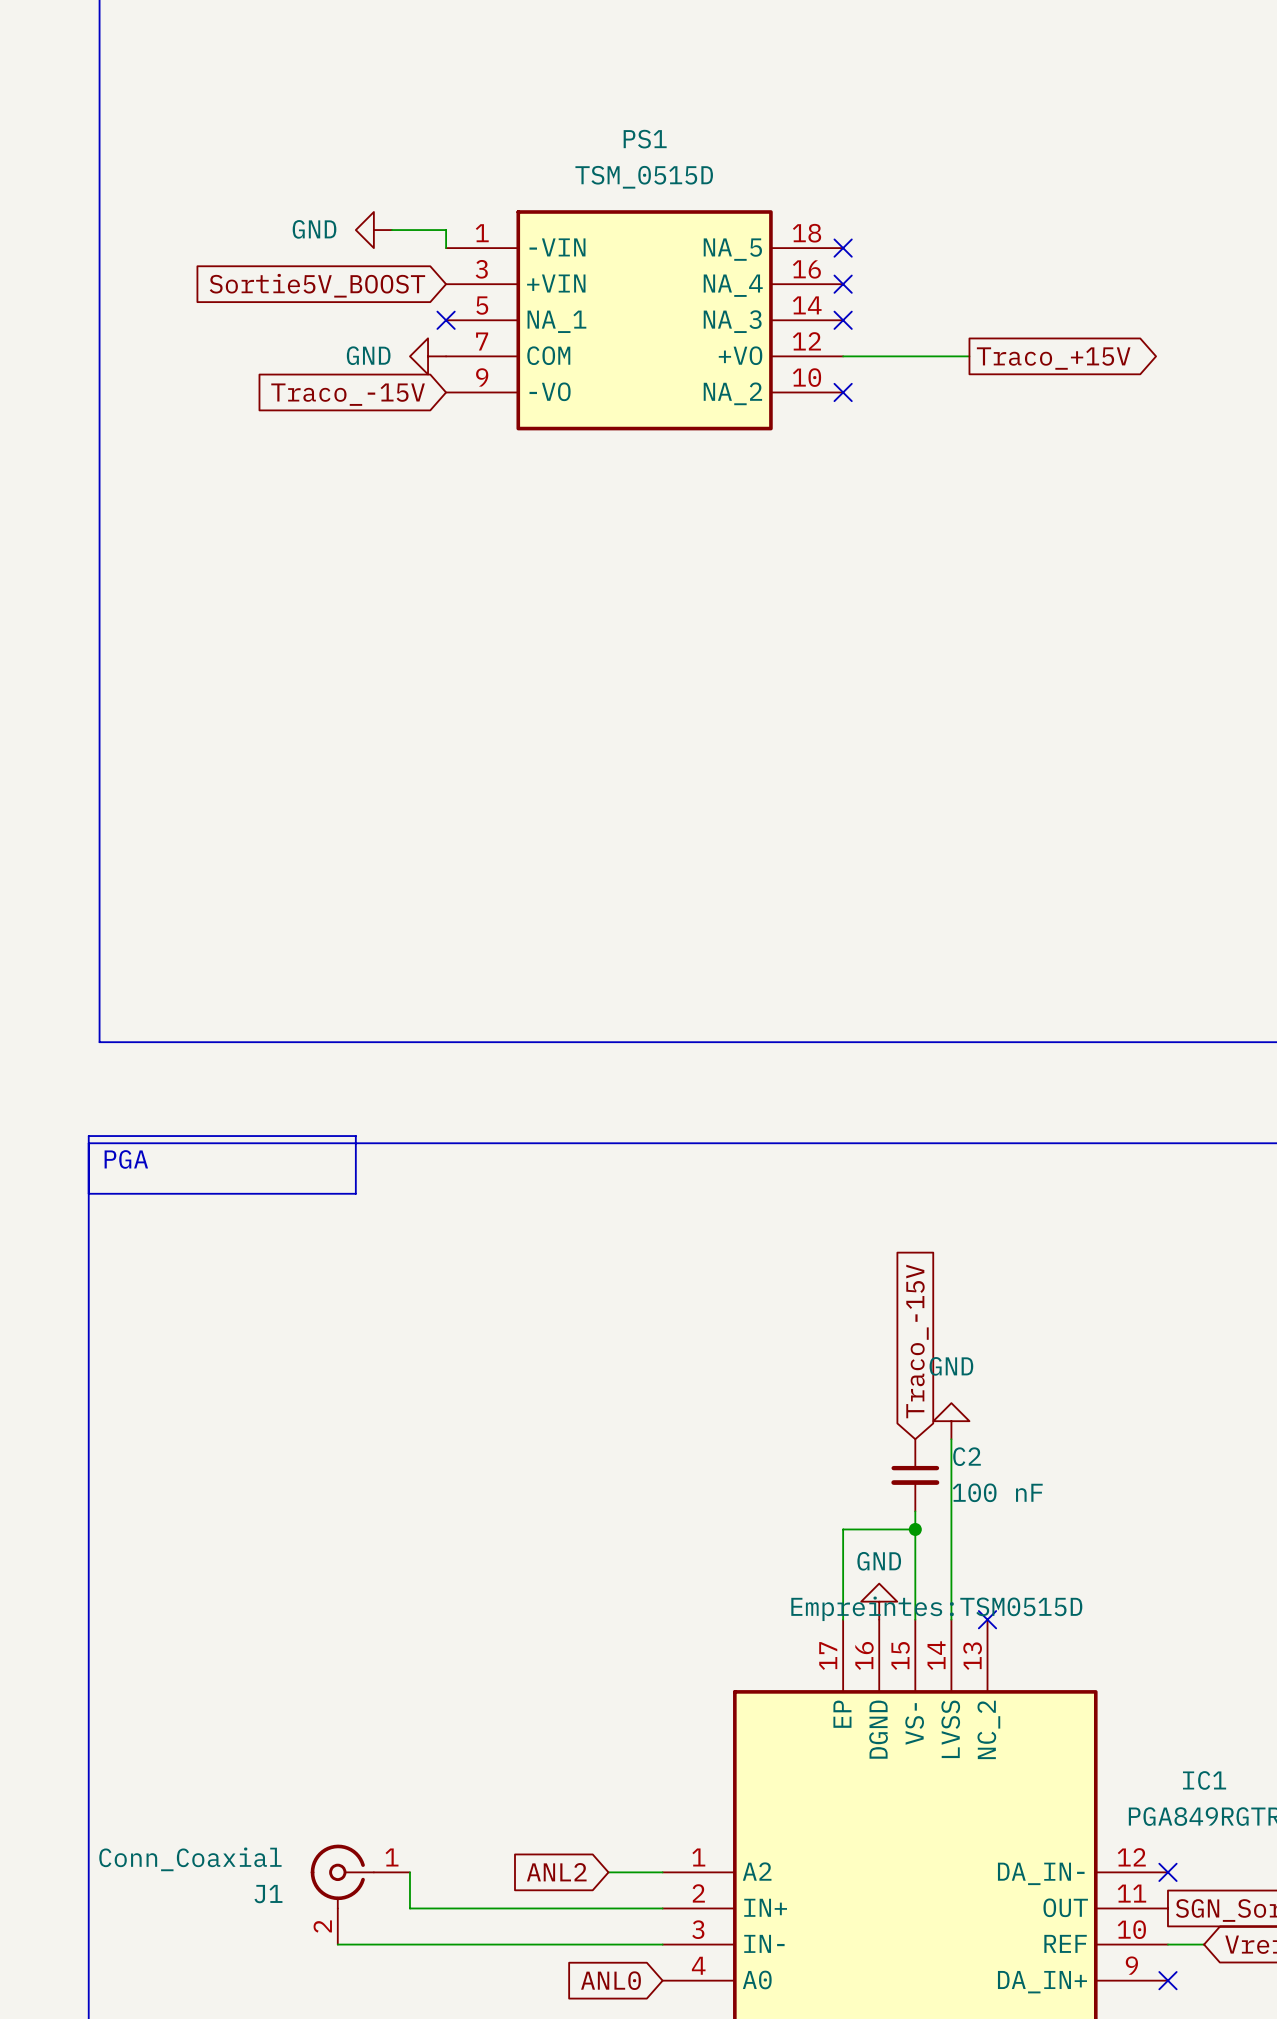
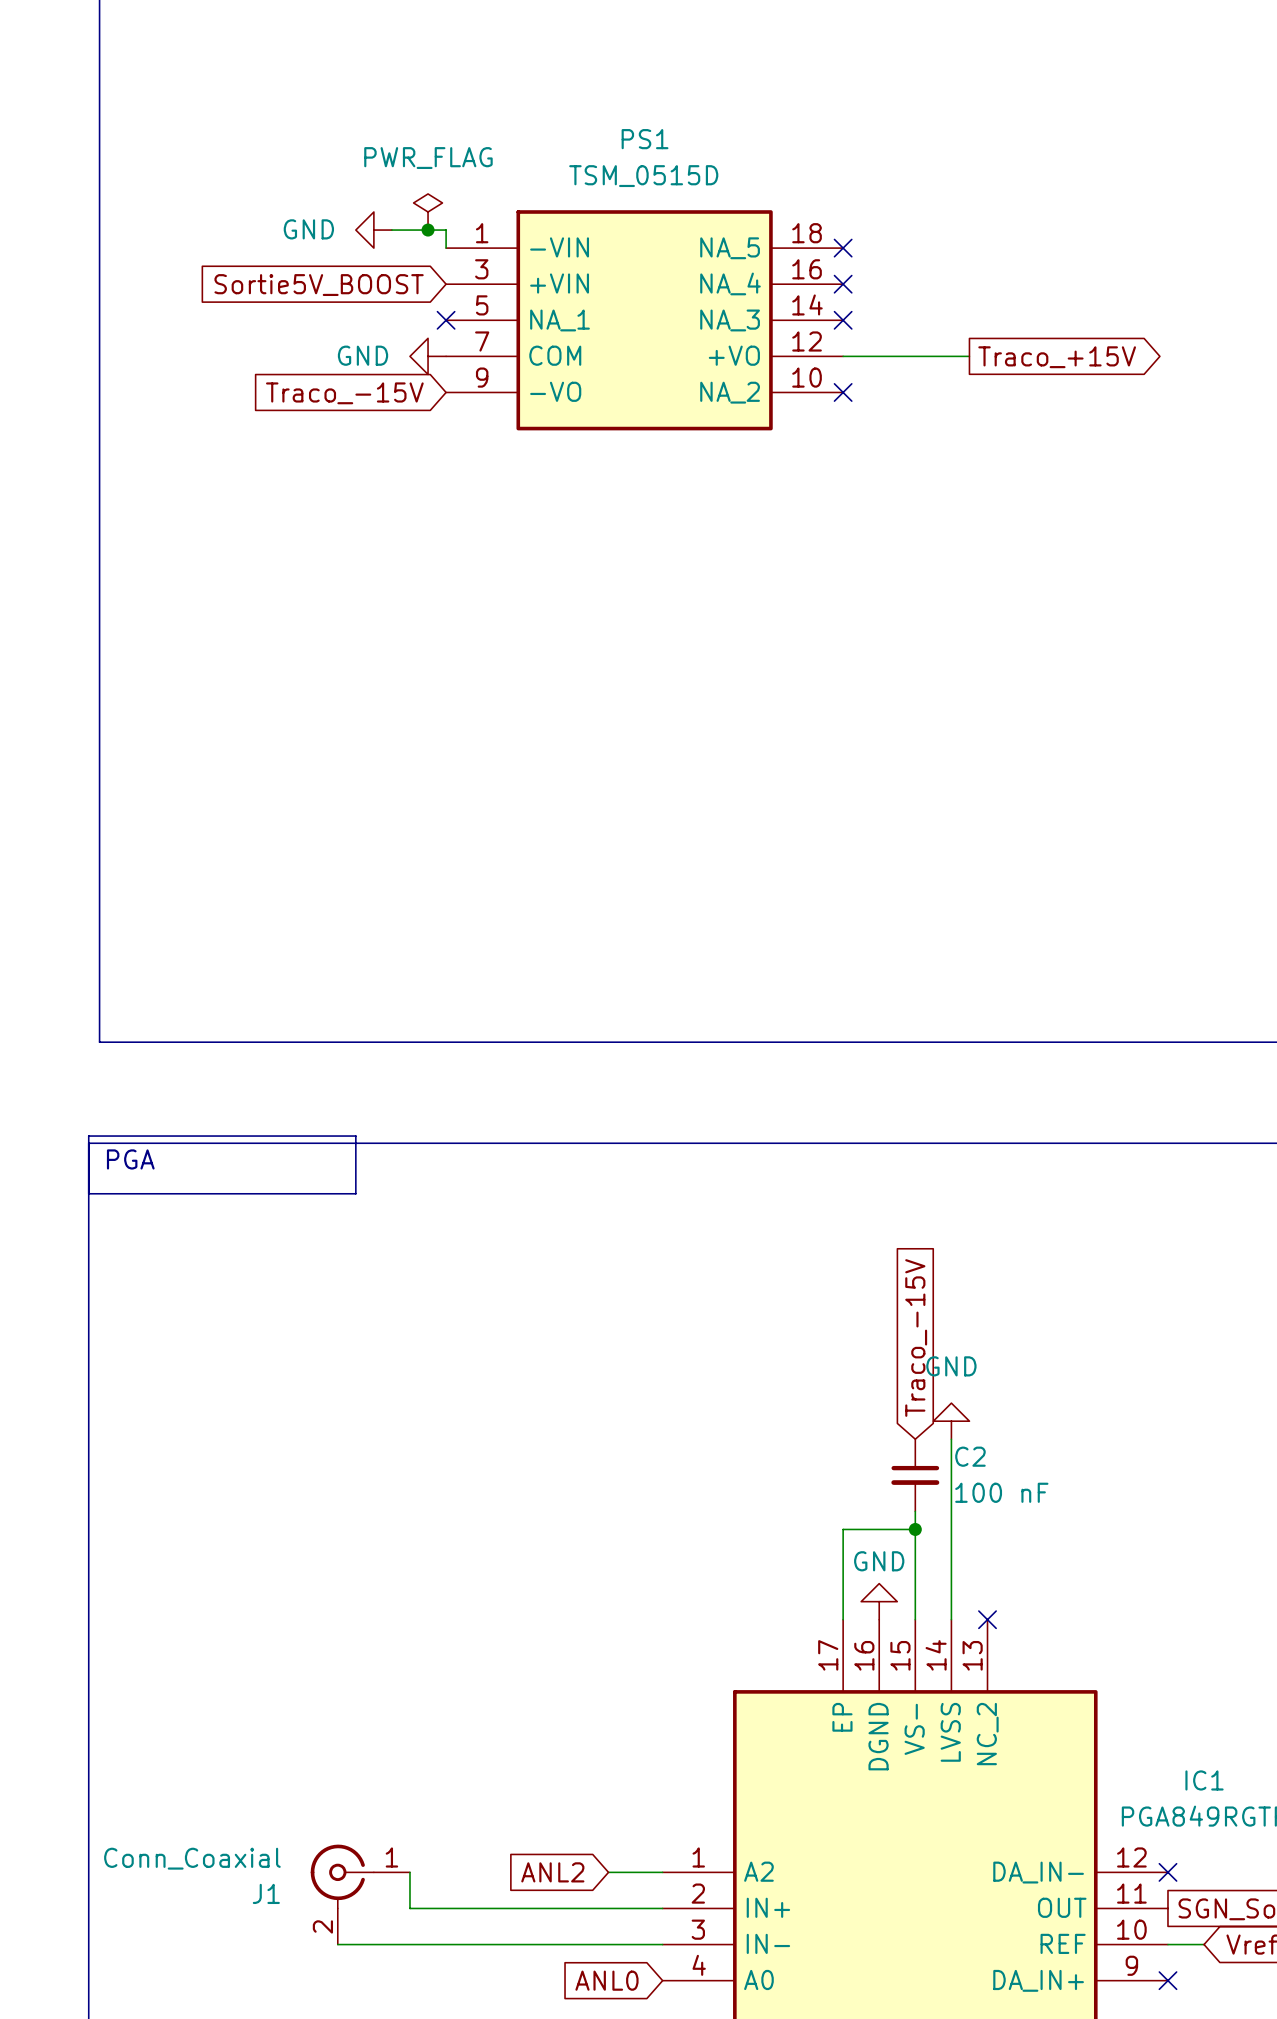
power symbol: none -> PWR_FLAG (428, 212)
junction: none -> (428, 230)
PS1 text: Empreintes:TSM0515D (936, 1608) -> none

